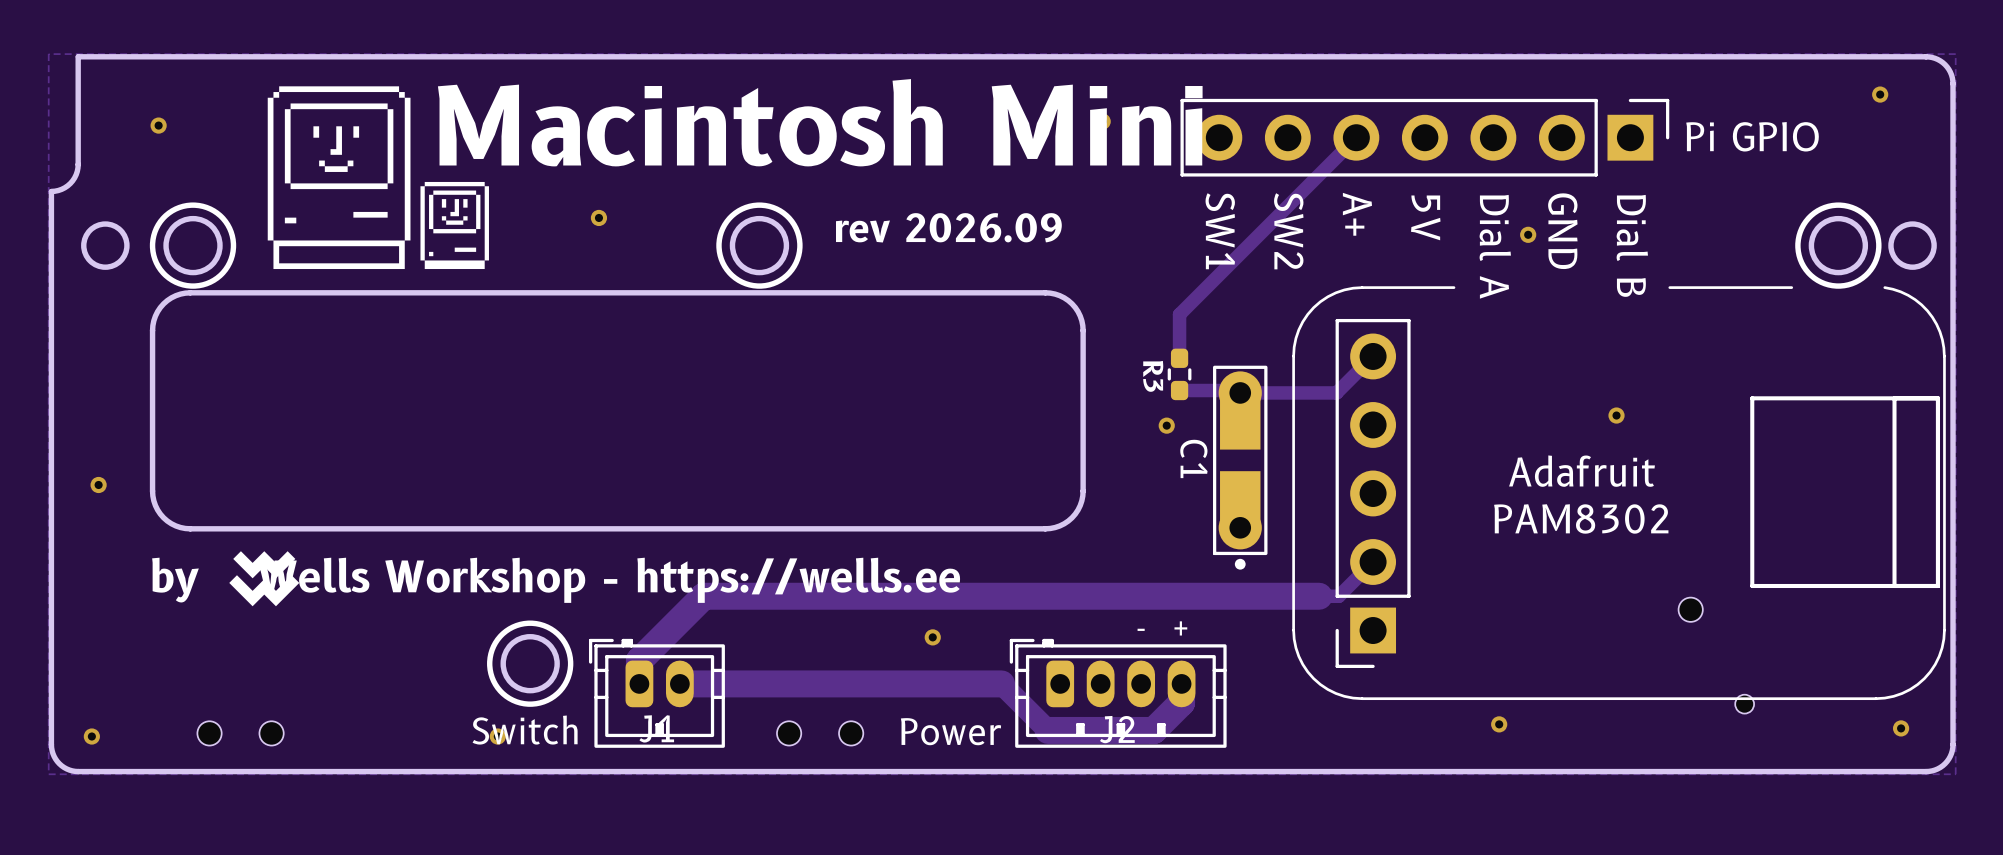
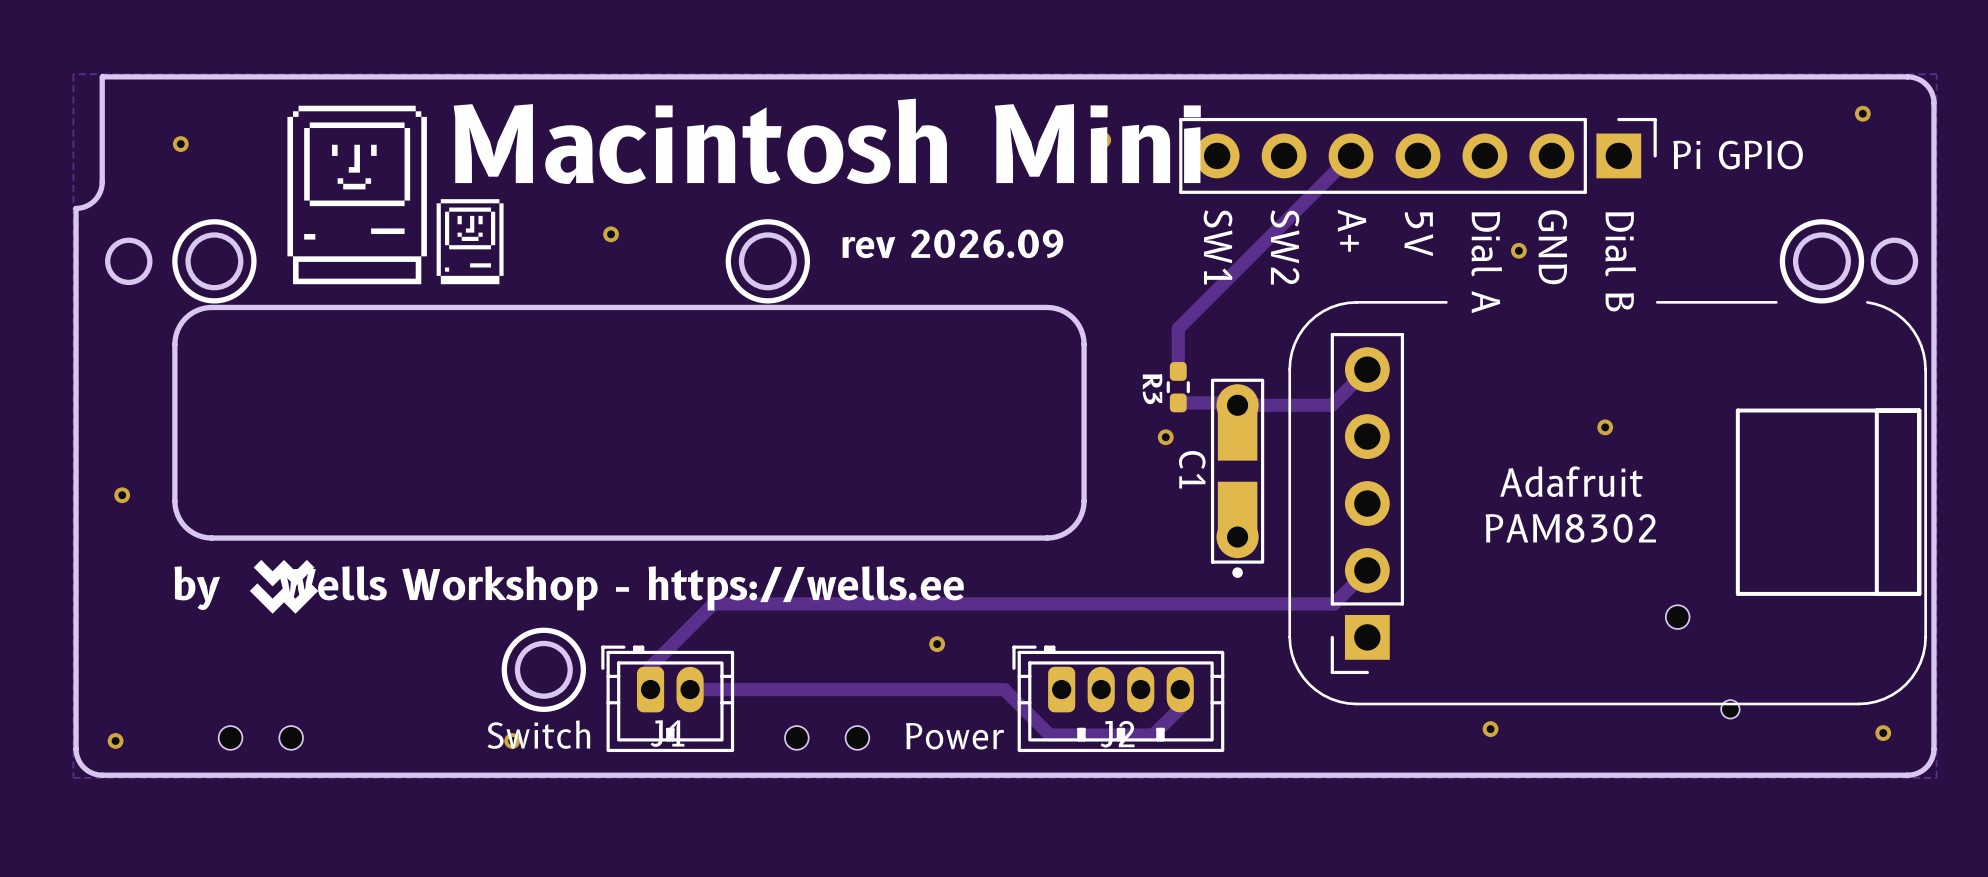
track width: thick (1319, 596) (703, 596) (639, 660) (639, 683) -> thin (1314, 603) (713, 603) (650, 666) (650, 689)
text: + (1180, 628) -> none
text: - (1141, 629) -> none
track width: thick (1181, 683) (1181, 702) (1153, 730) (1048, 730) (1001, 683) (679, 683) -> thin (1180, 689) (1180, 708) (1153, 735) (1049, 735) (1004, 689) (690, 689)

